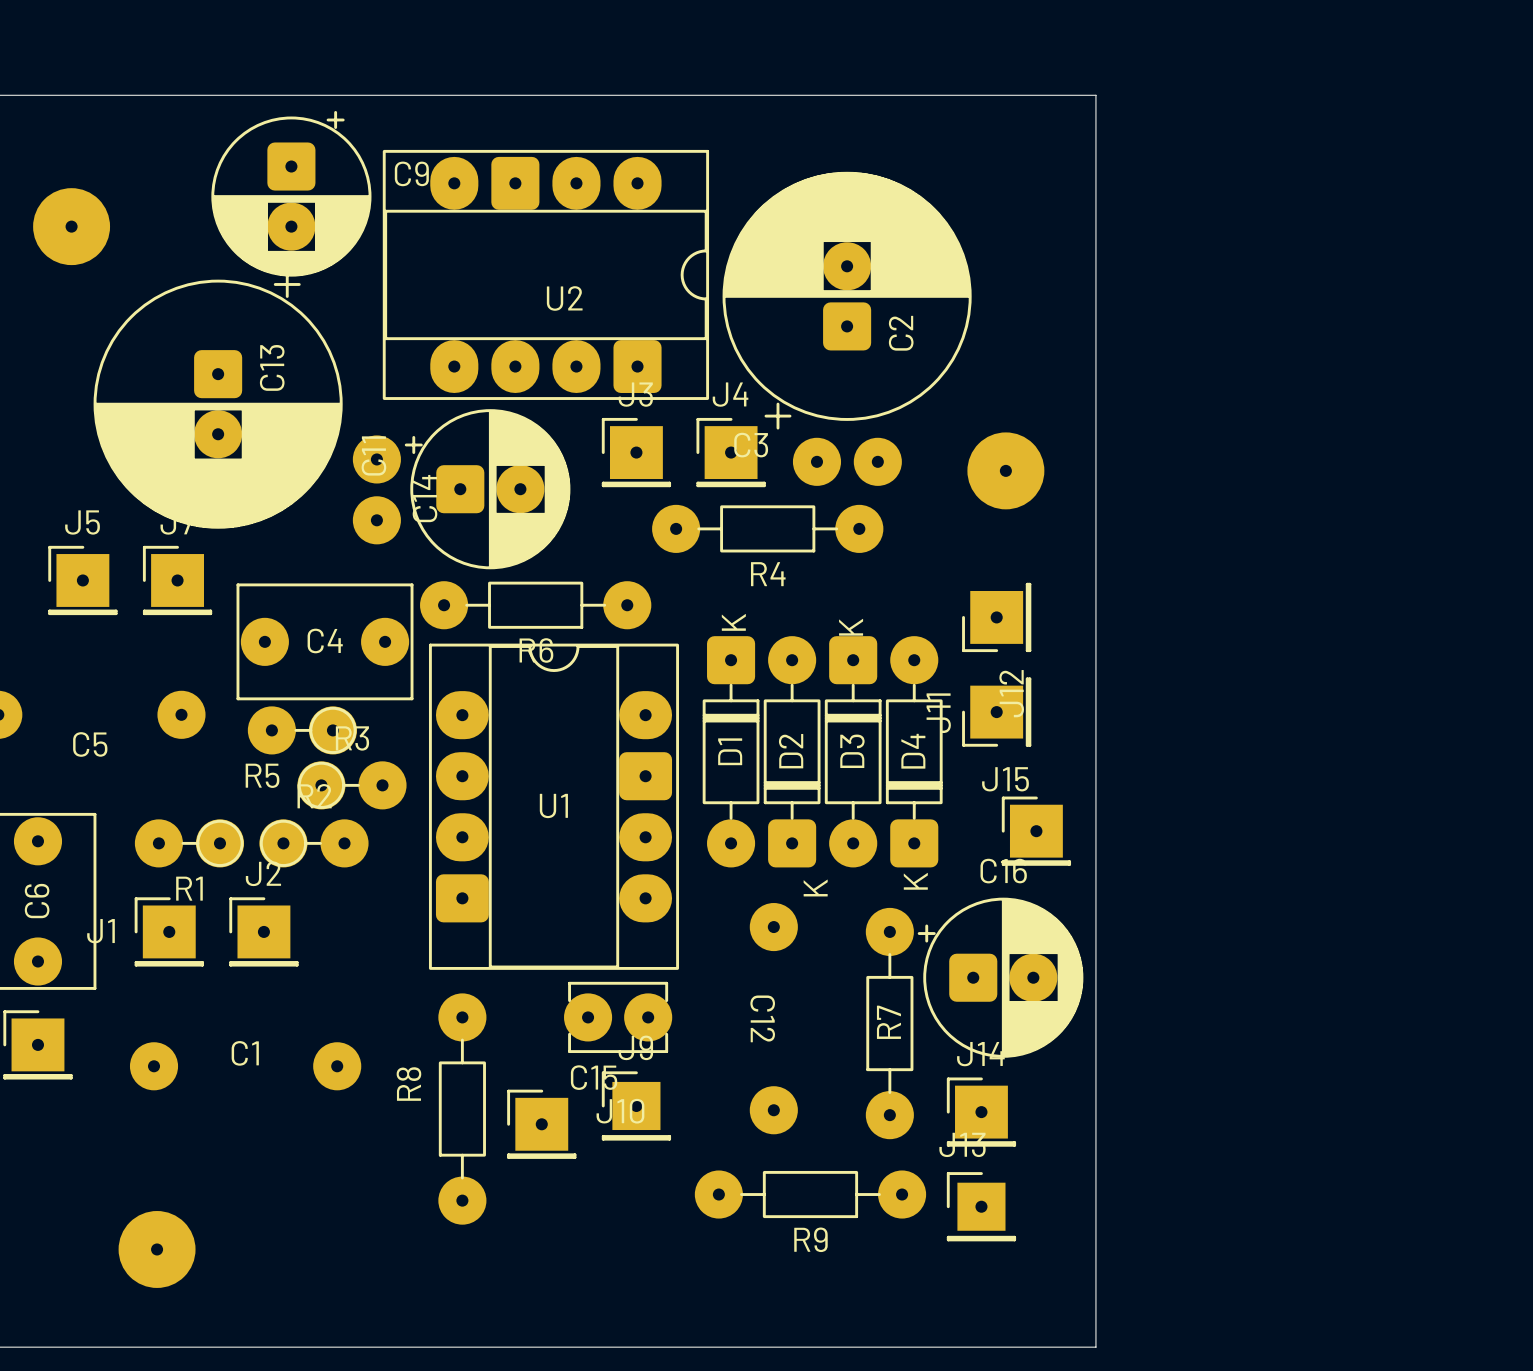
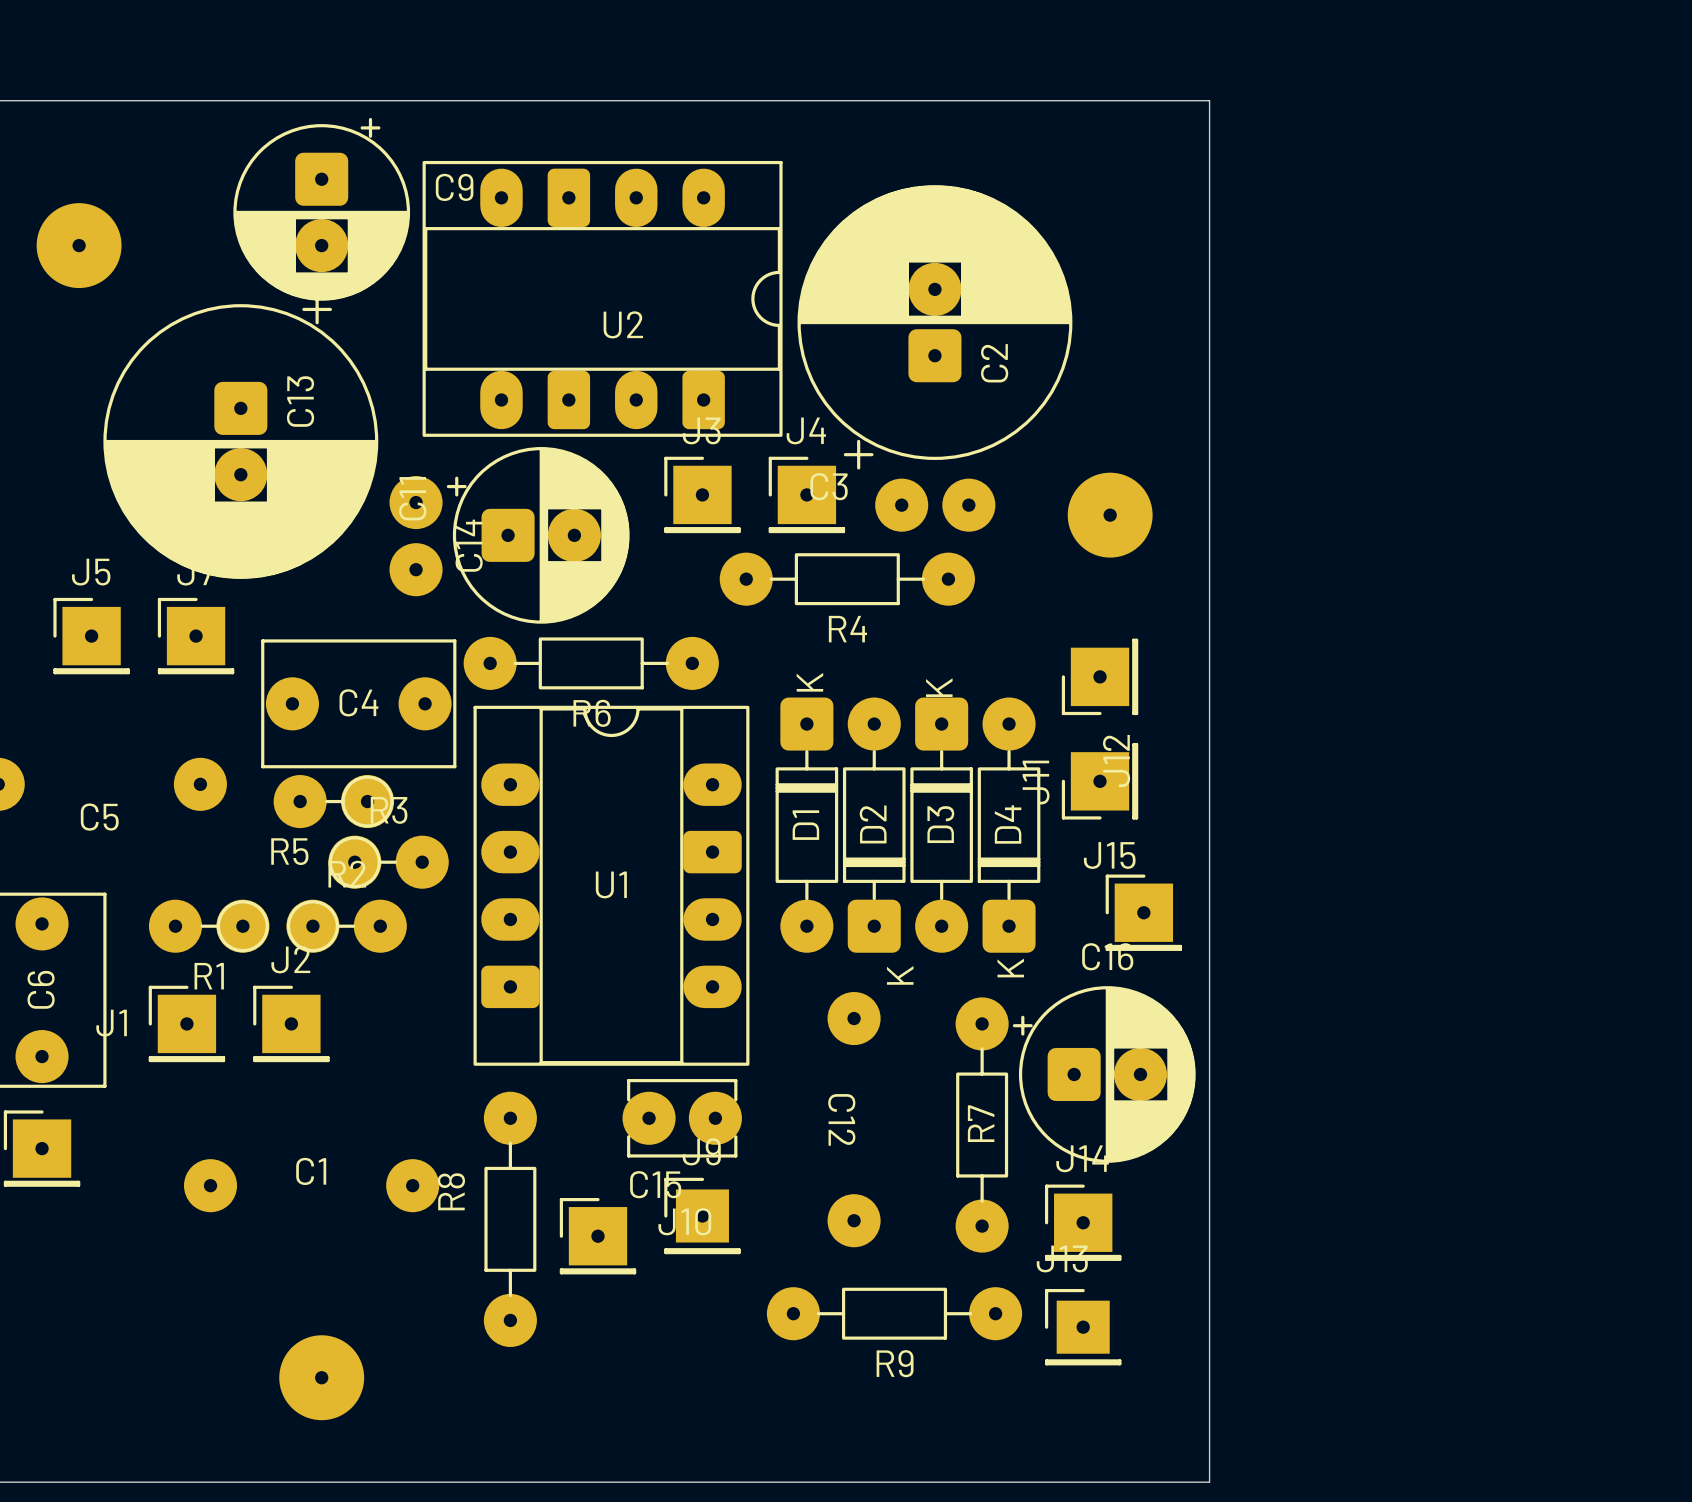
U2 footprint: [382, 149, 710, 400] -> [422, 160, 783, 437]
U1 footprint: [428, 643, 680, 970] -> [473, 705, 750, 1066]
C1 position: (245, 1066) -> (311, 1185)
part position: (157, 1249) -> (321, 1377)

